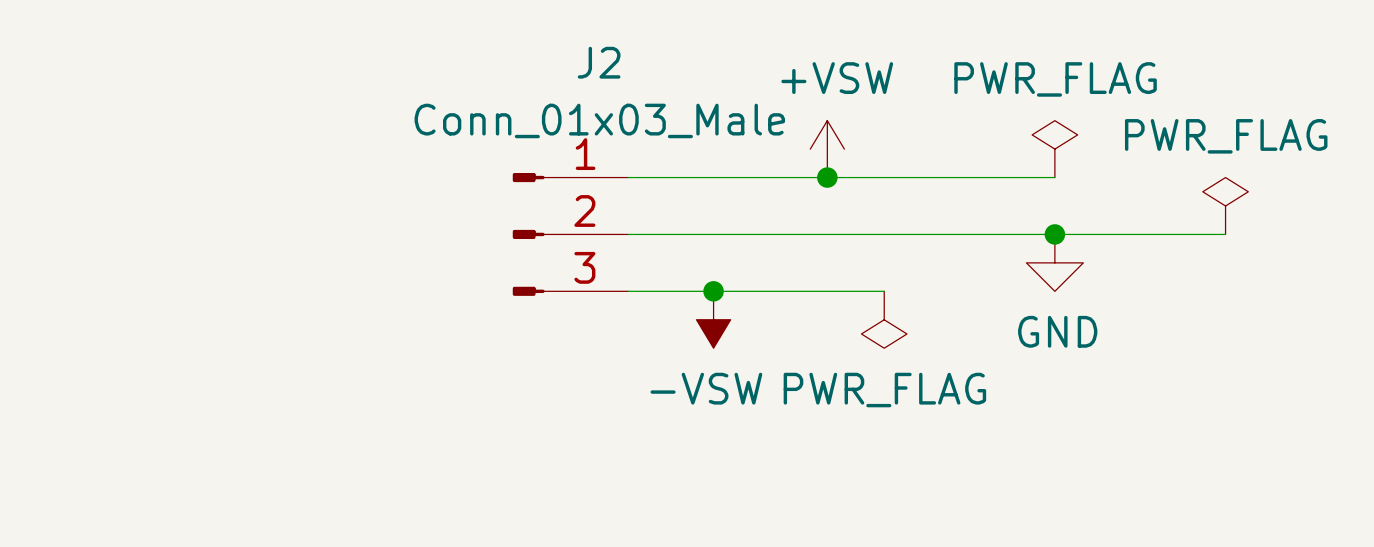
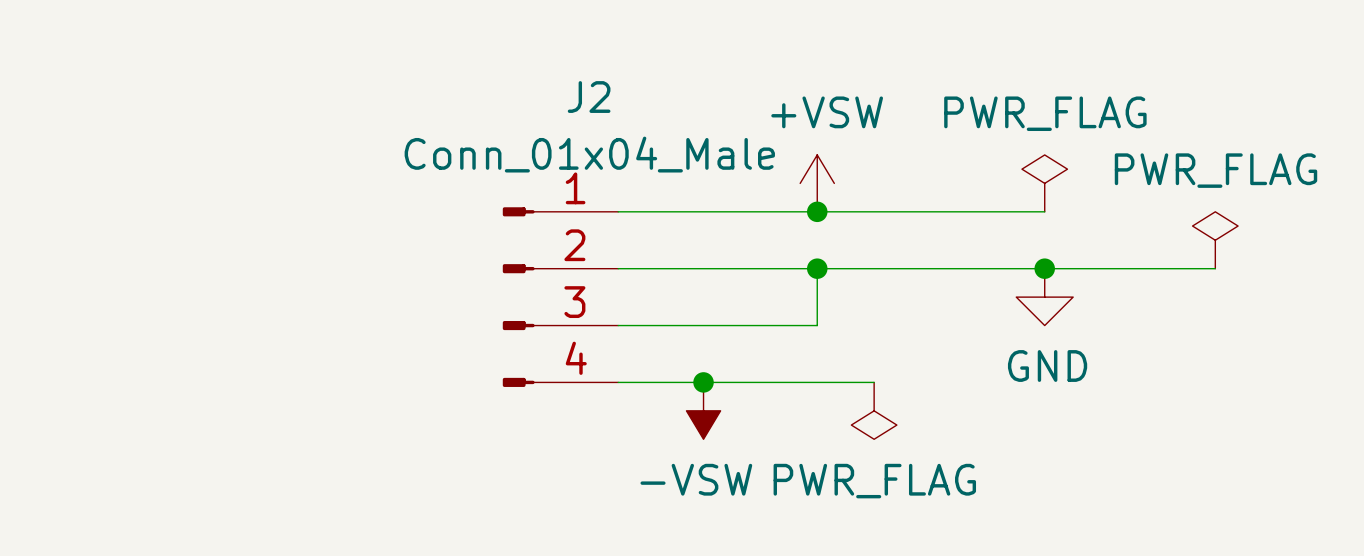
J2 value: Conn_01x03_Male (599, 120) -> Conn_01x04_Male (589, 154)
J2 symbol: [512, 173, 629, 296] -> [502, 207, 619, 387]
junction: none -> (817, 268)
junction position: (713, 291) -> (703, 382)
wire: (827, 291) (884, 291) -> (817, 325) (817, 268)
power symbol position: -VSW (713, 319) -> -VSW (703, 410)
power symbol position: PWR_FLAG (884, 319) -> PWR_FLAG (874, 410)
wire: none -> (618, 382) (874, 382)

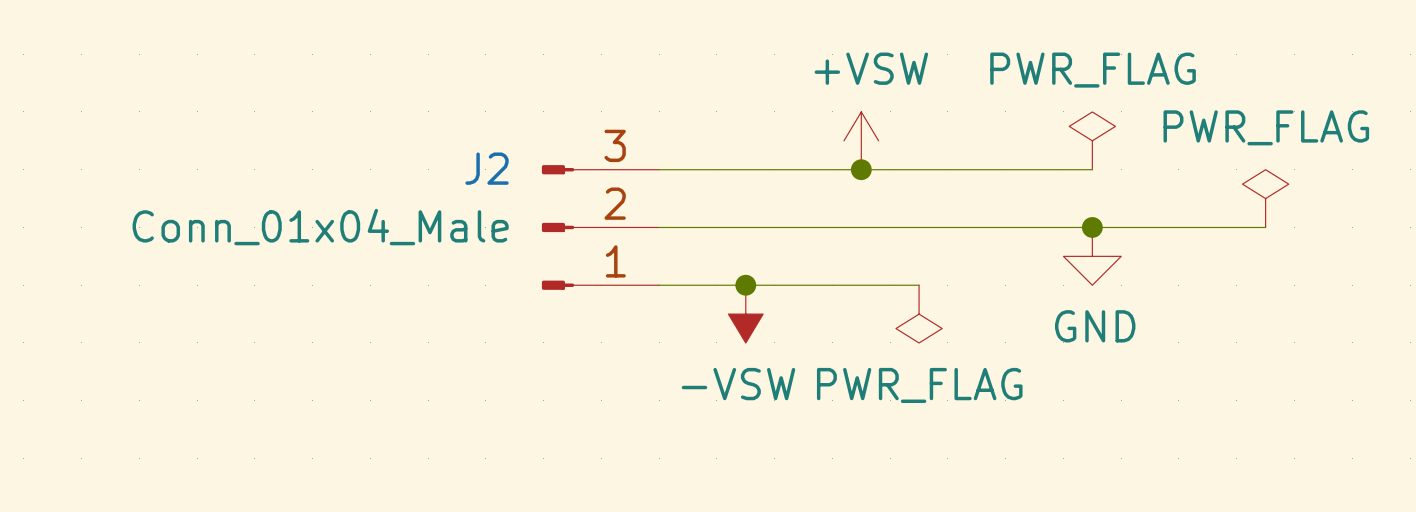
J2 name position: J2 (589, 97) -> J2 (487, 168)
J2 value position: Conn_01x04_Male (589, 154) -> Conn_01x04_Male (320, 227)
J2 symbol: [502, 207, 619, 387] -> [541, 165, 660, 290]
wire: (817, 268) (817, 325) -> (919, 285) (861, 285)
junction: (817, 268) -> none
wire: (618, 382) (874, 382) -> none
junction position: (703, 382) -> (745, 285)
power symbol position: -VSW (703, 410) -> -VSW (745, 314)
power symbol position: PWR_FLAG (874, 410) -> PWR_FLAG (919, 314)

